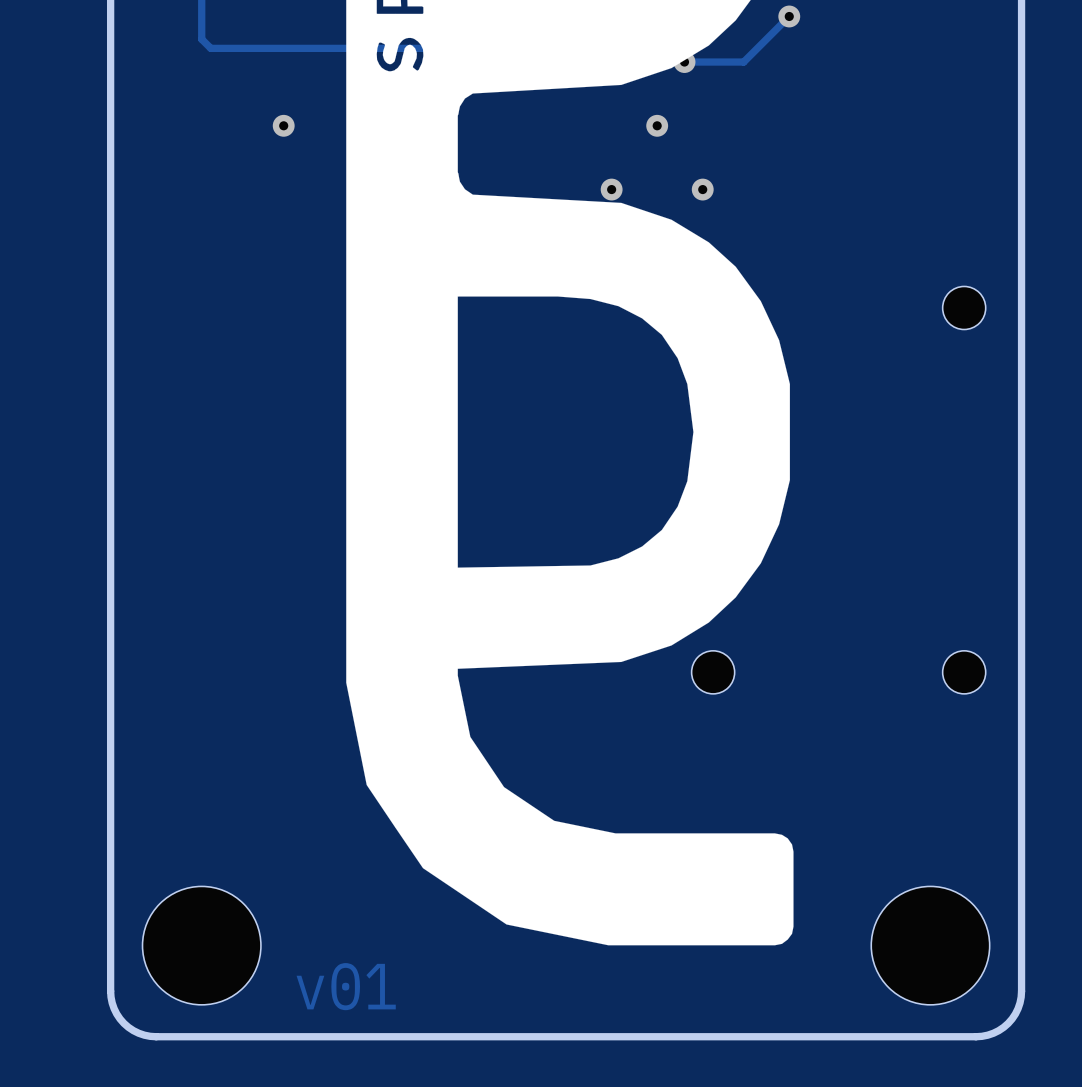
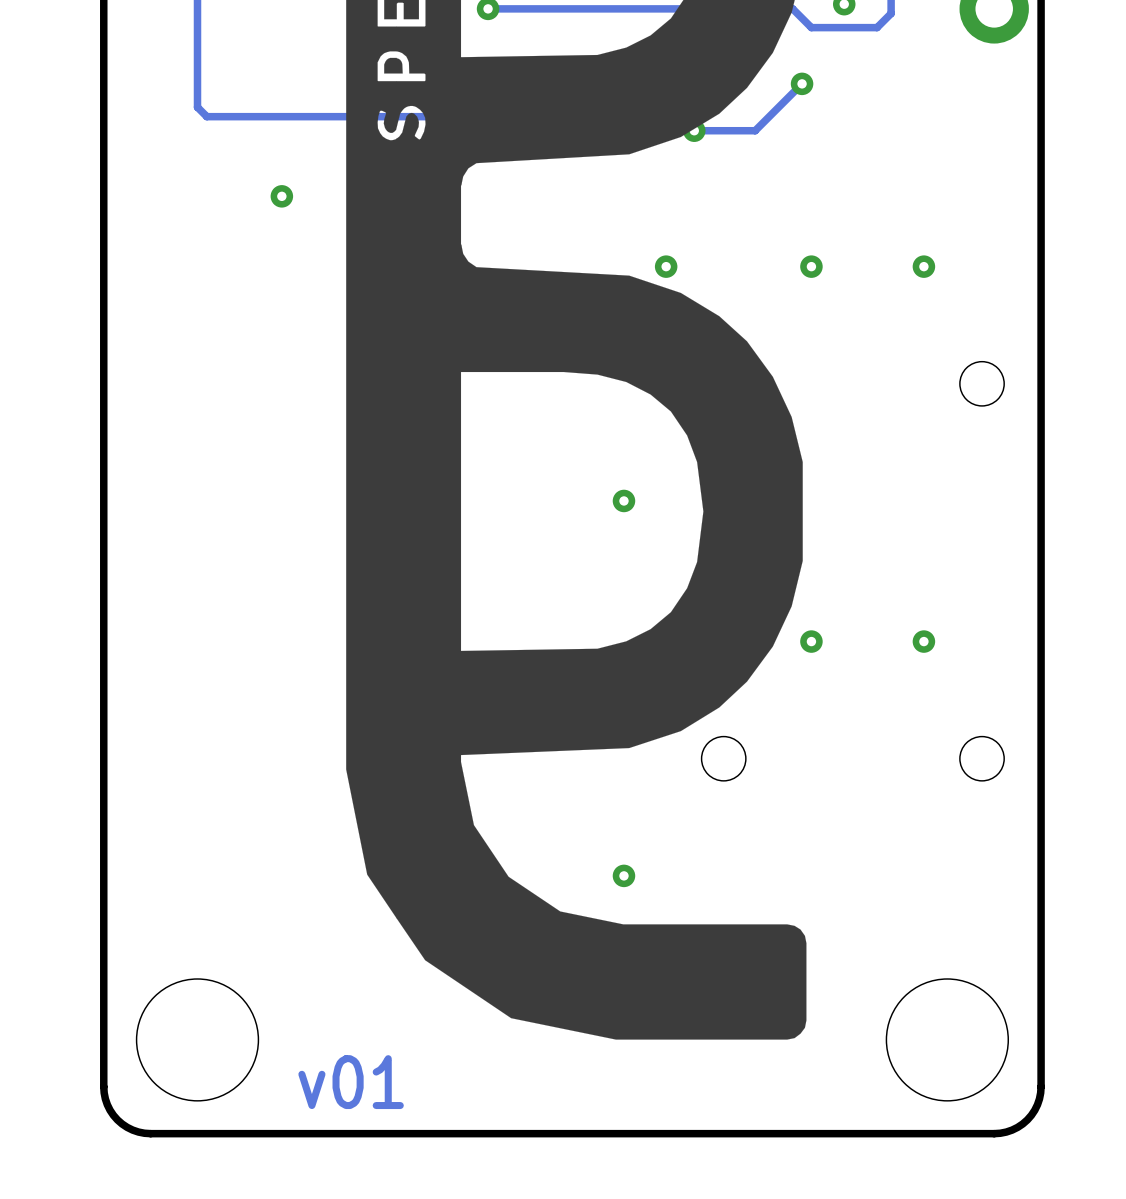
via: (657, 125) -> none
via: (611, 189) -> none
via: (702, 189) -> none
via: none -> (666, 266)
via: none -> (811, 266)
via: none -> (923, 266)
via: none -> (623, 500)
via: none -> (811, 641)
via: none -> (923, 641)
via: none -> (623, 875)

